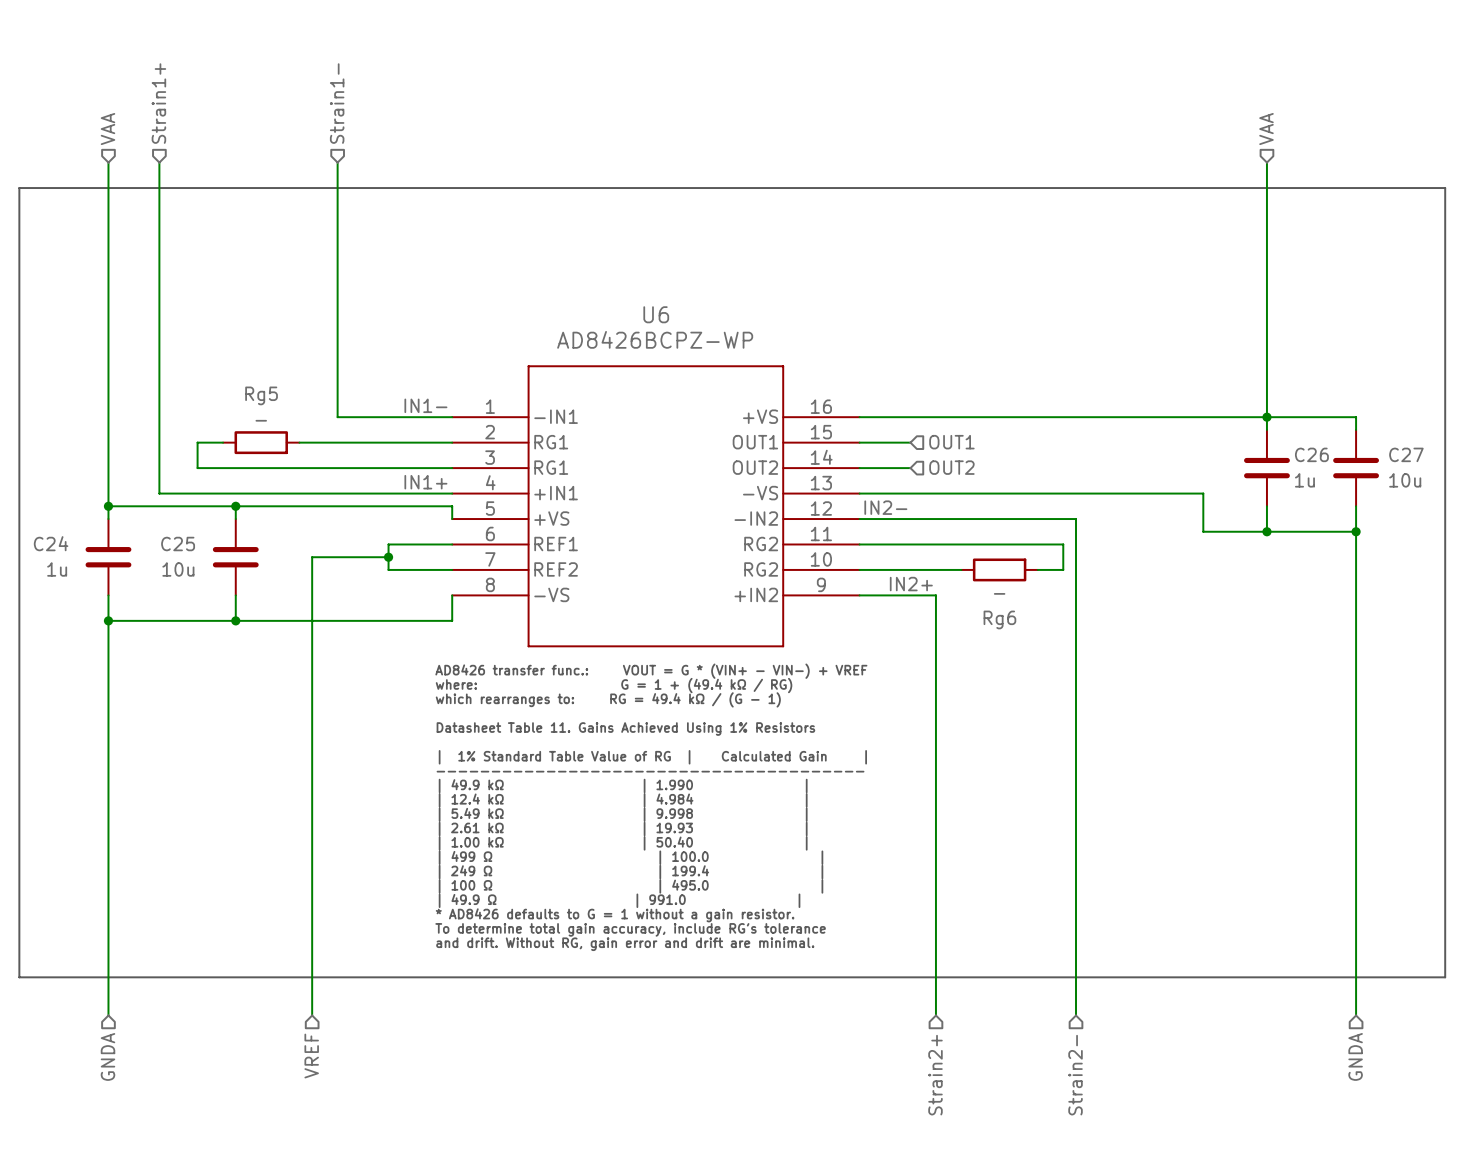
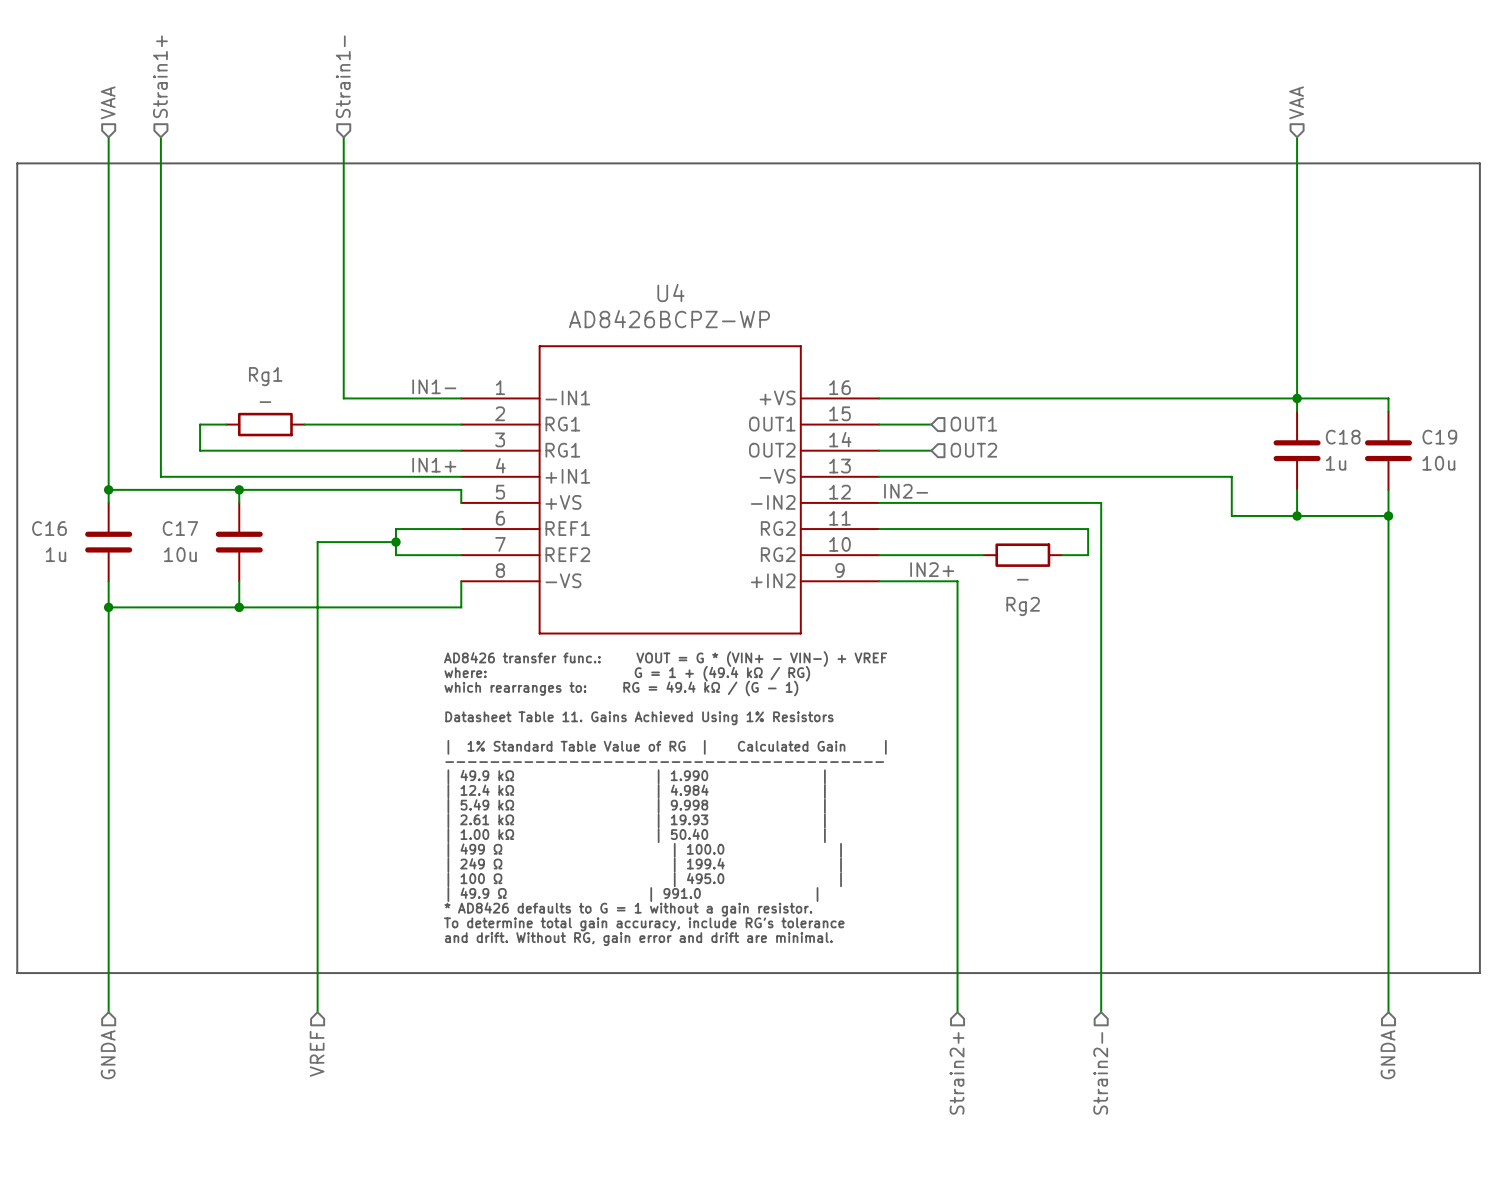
U6 name: U6 (656, 314) -> U4 (670, 293)
Rg5 name: Rg5 (261, 395) -> Rg1 (265, 376)
C26 name: C26 (1311, 454) -> C18 (1343, 437)
C27 name: C27 (1406, 454) -> C19 (1439, 437)
C24 name: C24 (51, 543) -> C16 (49, 528)
C25 name: C25 (178, 544) -> C17 (180, 528)
Rg6 name: Rg6 (999, 619) -> Rg2 (1023, 606)

